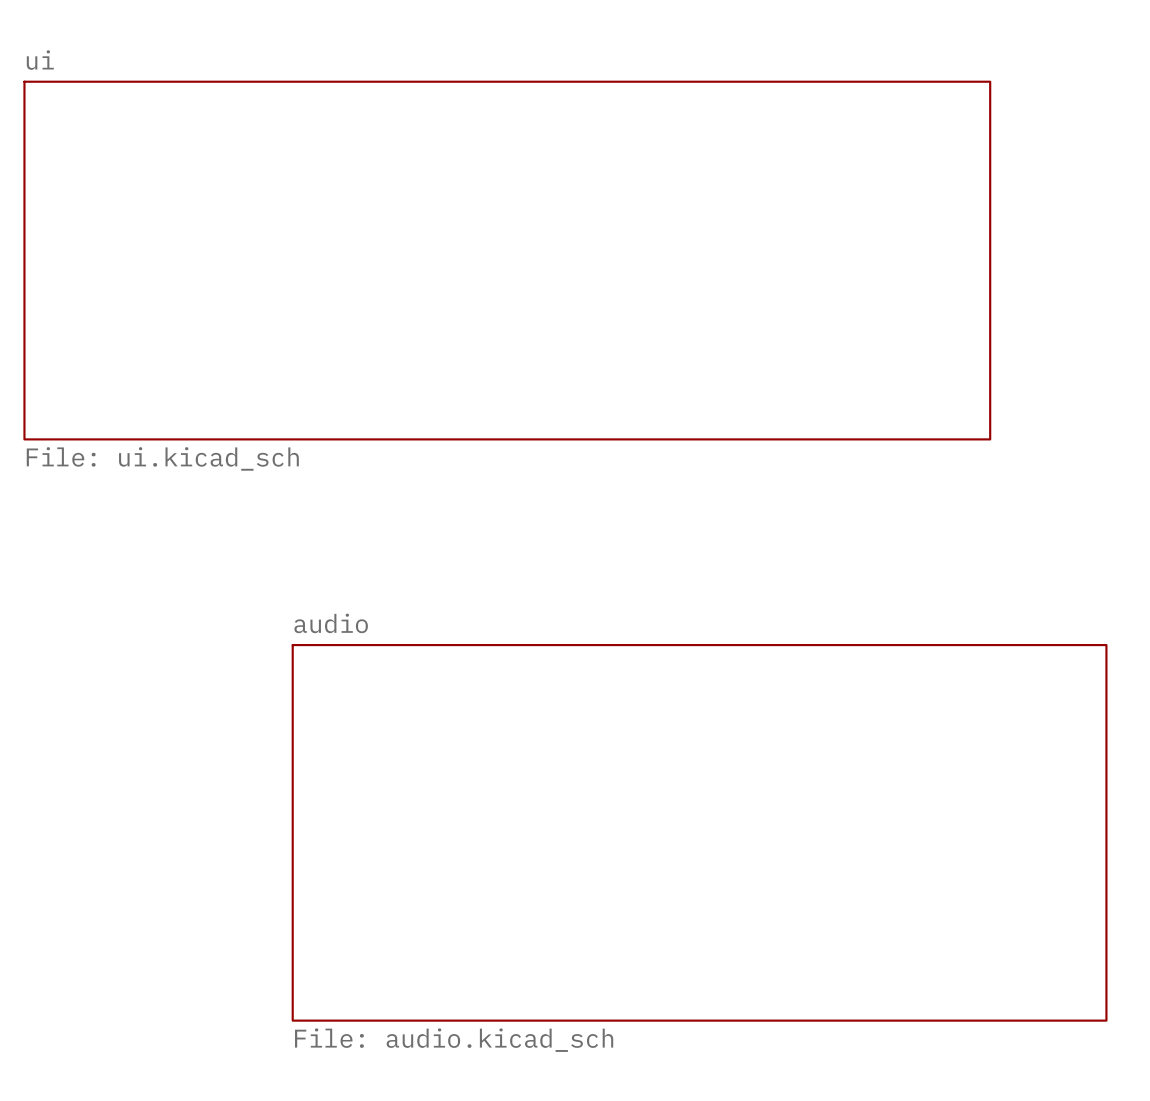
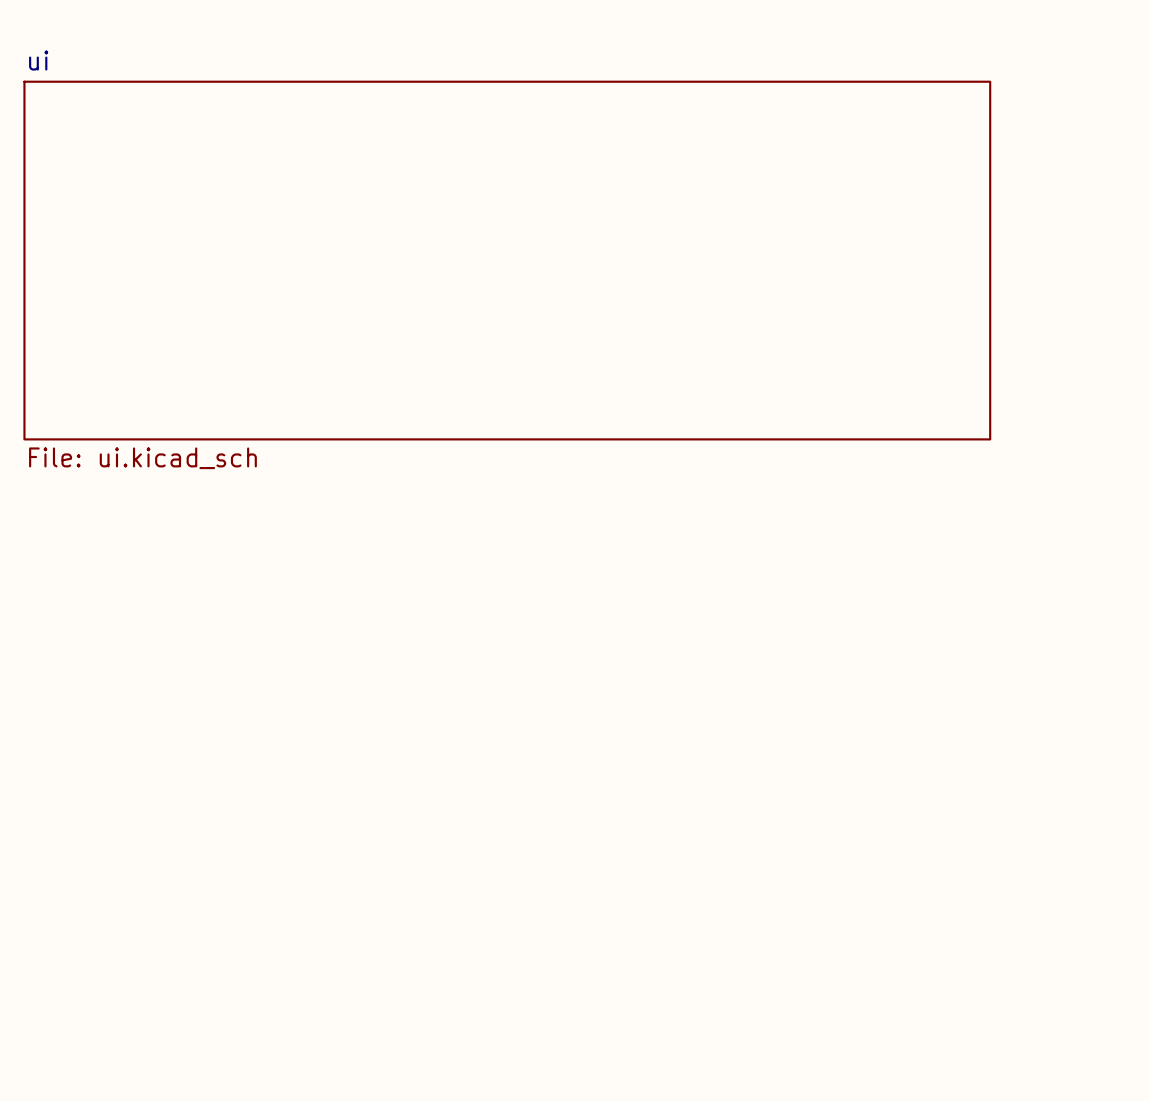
sheet audio: File: audio.kicad_sch (699, 832) -> none

